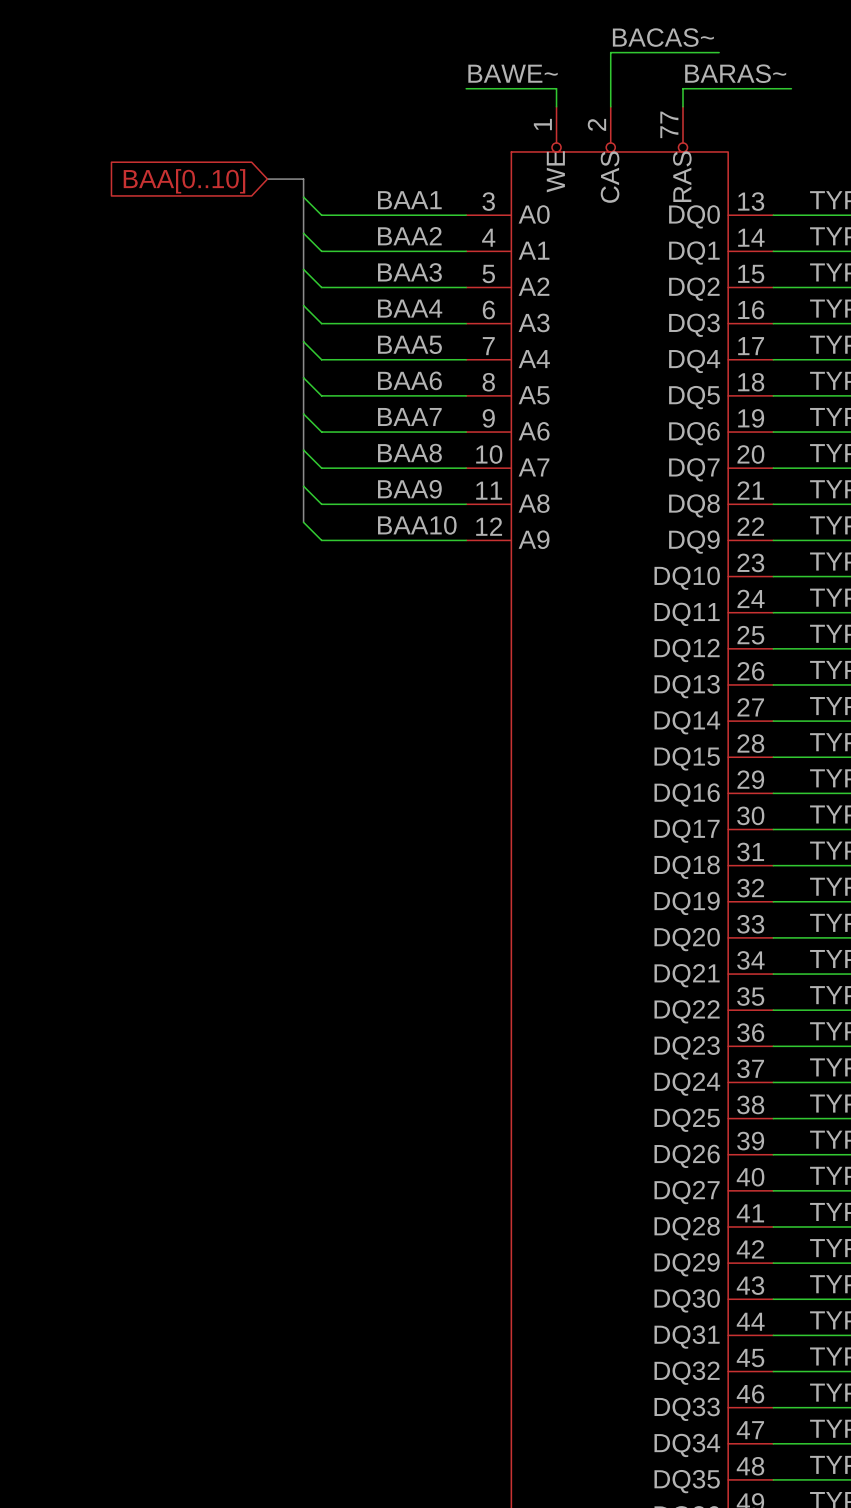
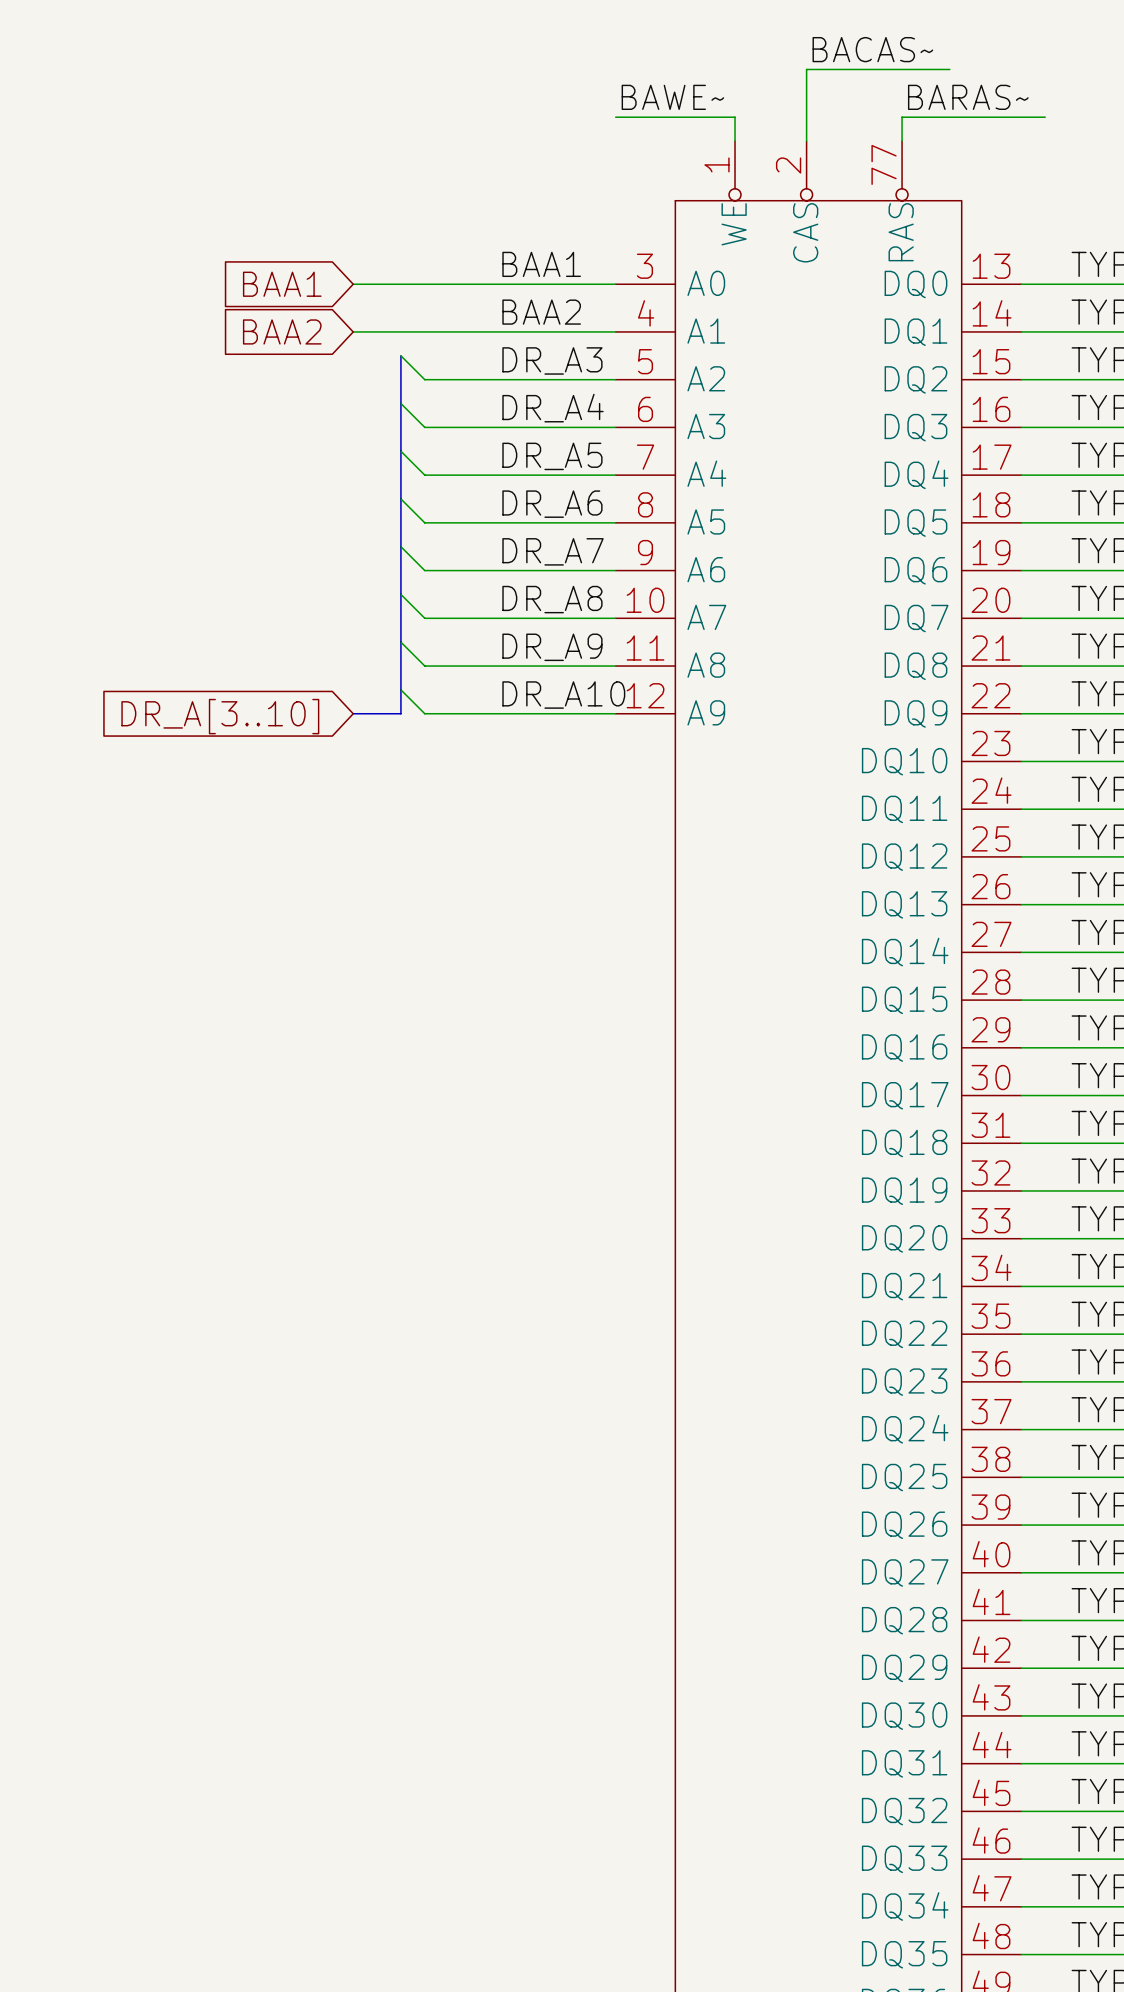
bus: (267, 179) (303, 179) (303, 269) -> none
global label: BAA[0..10] (184, 181) -> none
wire: (303, 197) (321, 215) -> (353, 284) (424, 284)
global label: none -> BAA1 (282, 284)
wire: (303, 233) (321, 251) -> (353, 331) (424, 331)
global label: none -> BAA2 (282, 331)
label: BAA3 (409, 272) -> DR_A3 (552, 360)
label: BAA4 (410, 308) -> DR_A4 (553, 408)
label: BAA5 (409, 344) -> DR_A5 (552, 456)
label: BAA6 (409, 380) -> DR_A6 (552, 504)
label: BAA7 (409, 416) -> DR_A7 (553, 551)
label: BAA8 (409, 453) -> DR_A8 (552, 599)
label: BAA9 (409, 489) -> DR_A9 (552, 647)
bus: none -> (400, 689) (400, 713) (353, 713)
label: BAA10 (417, 525) -> DR_A10 (563, 695)
global label: none -> DR_A[3..10] (220, 716)

